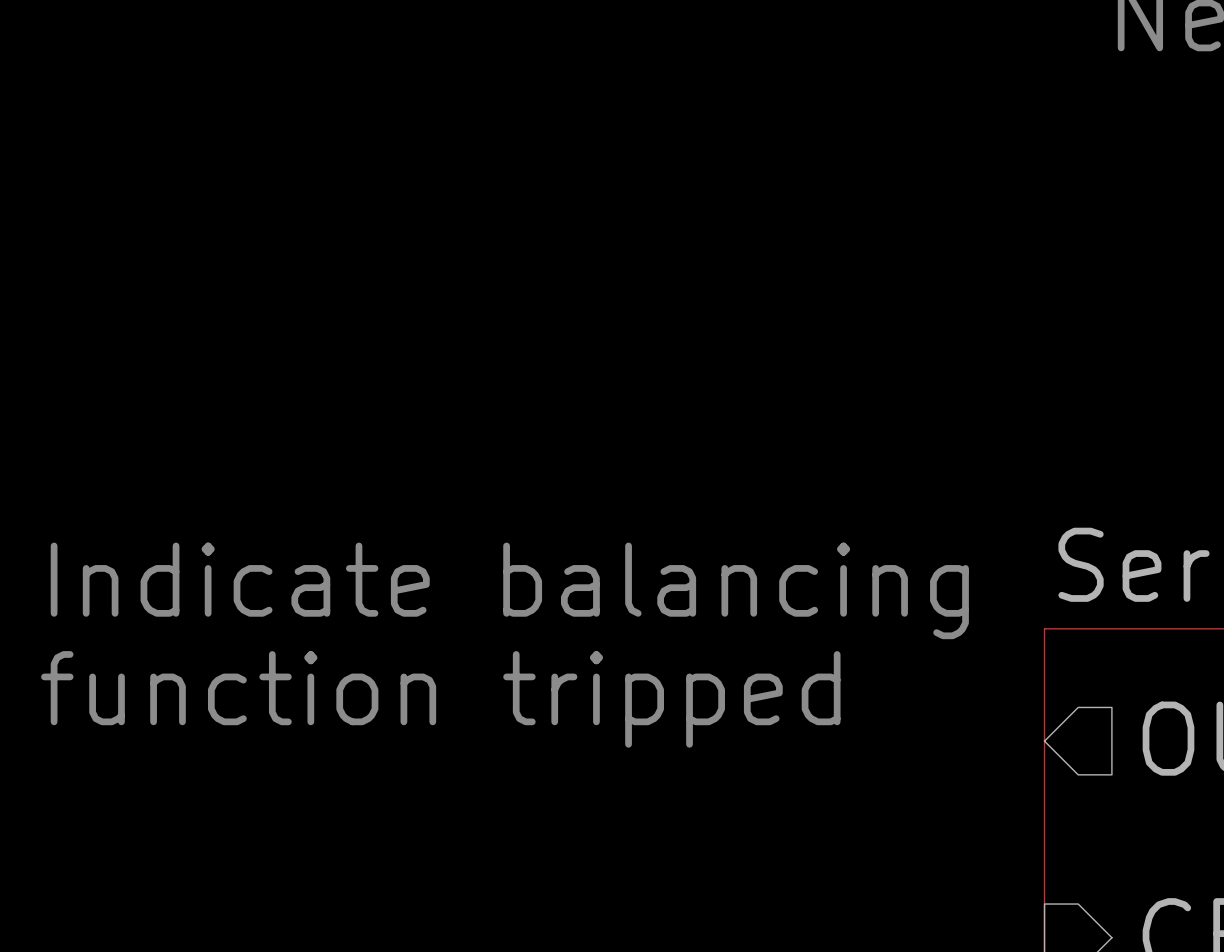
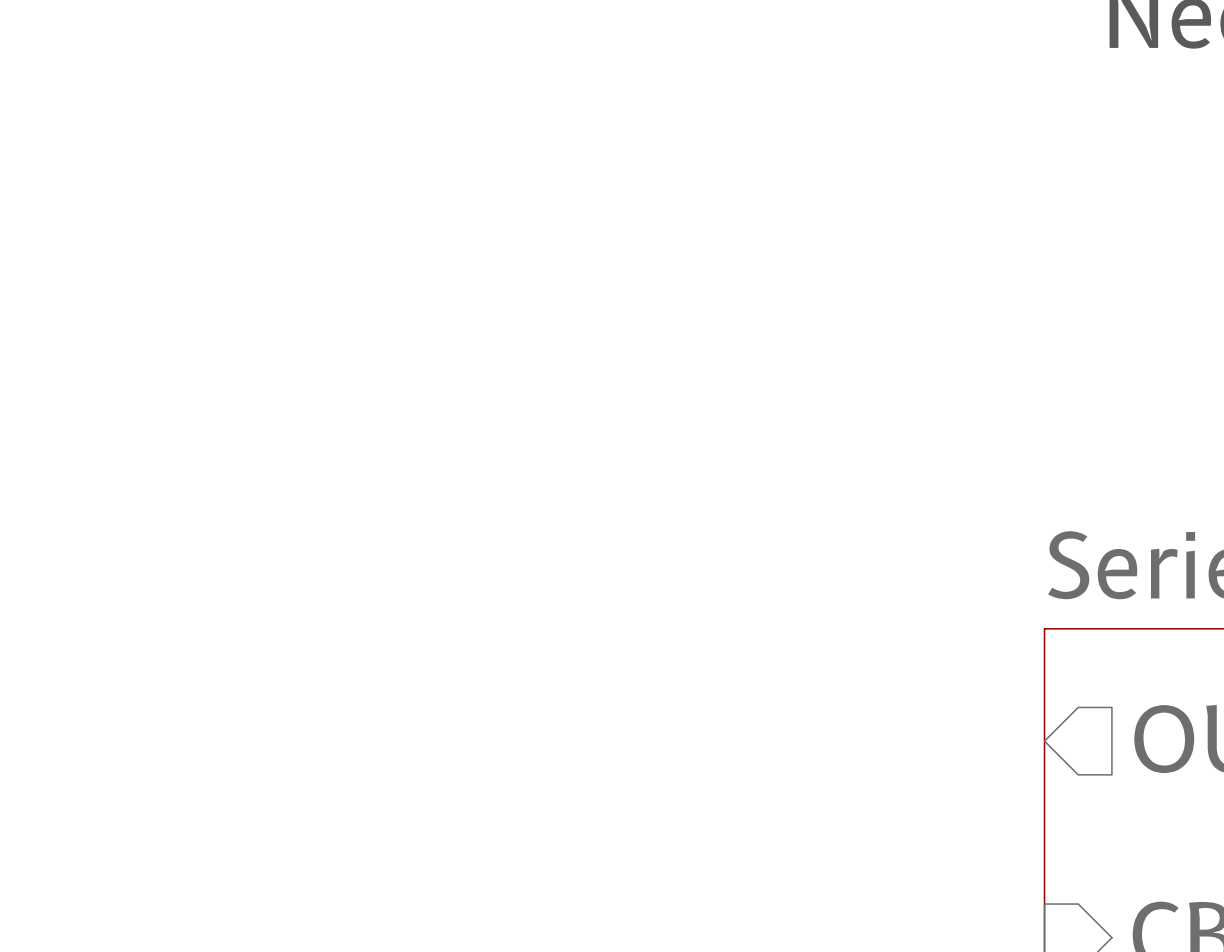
text: Indicate balancing (509, 590) -> none
text: function tripped (440, 699) -> none

